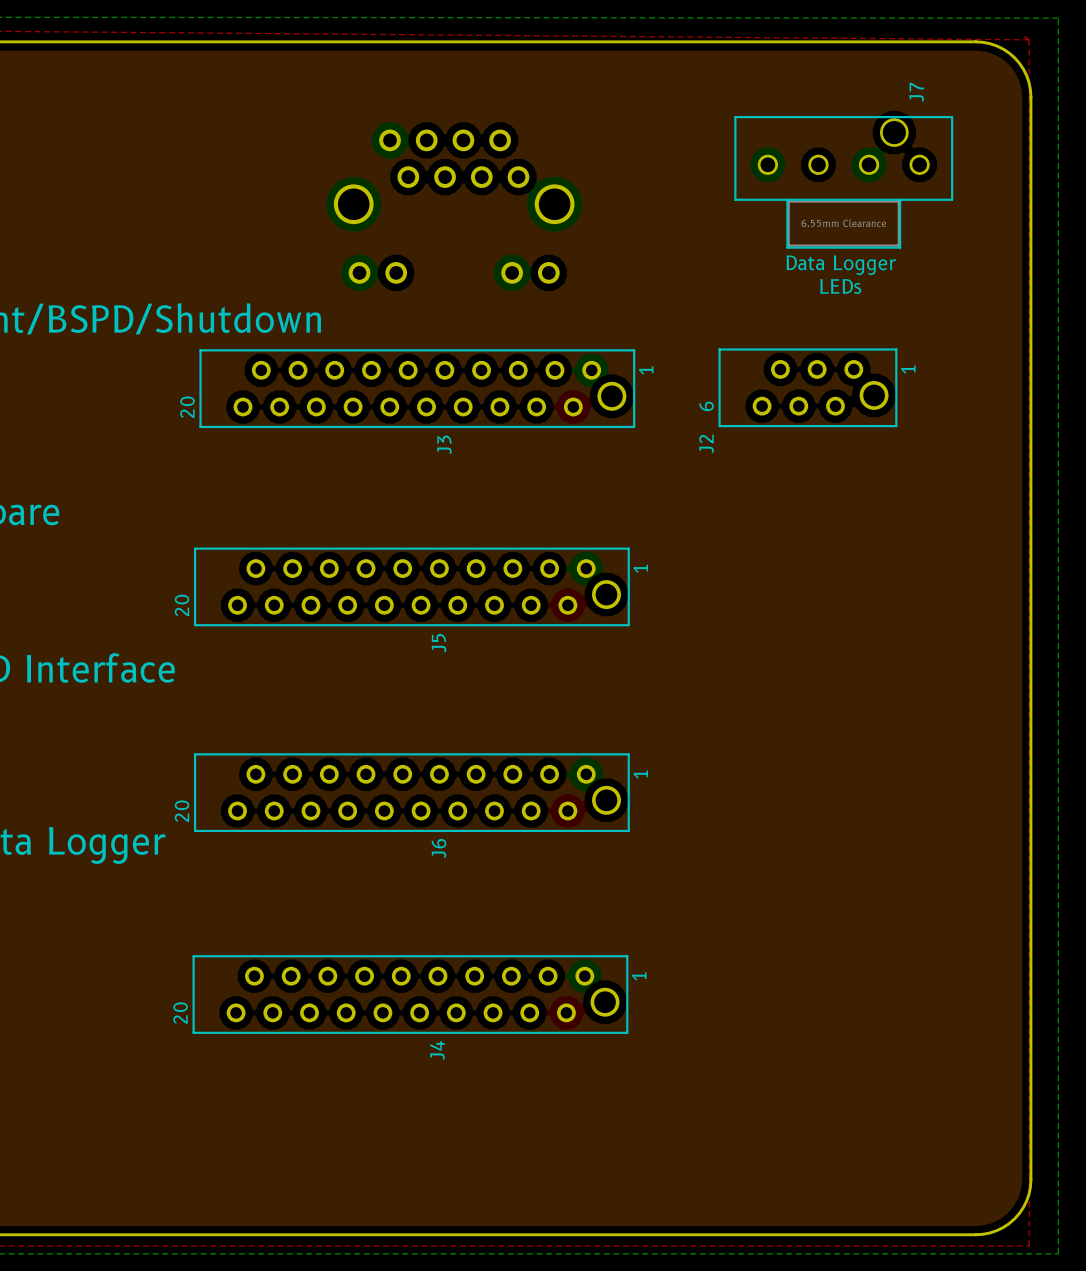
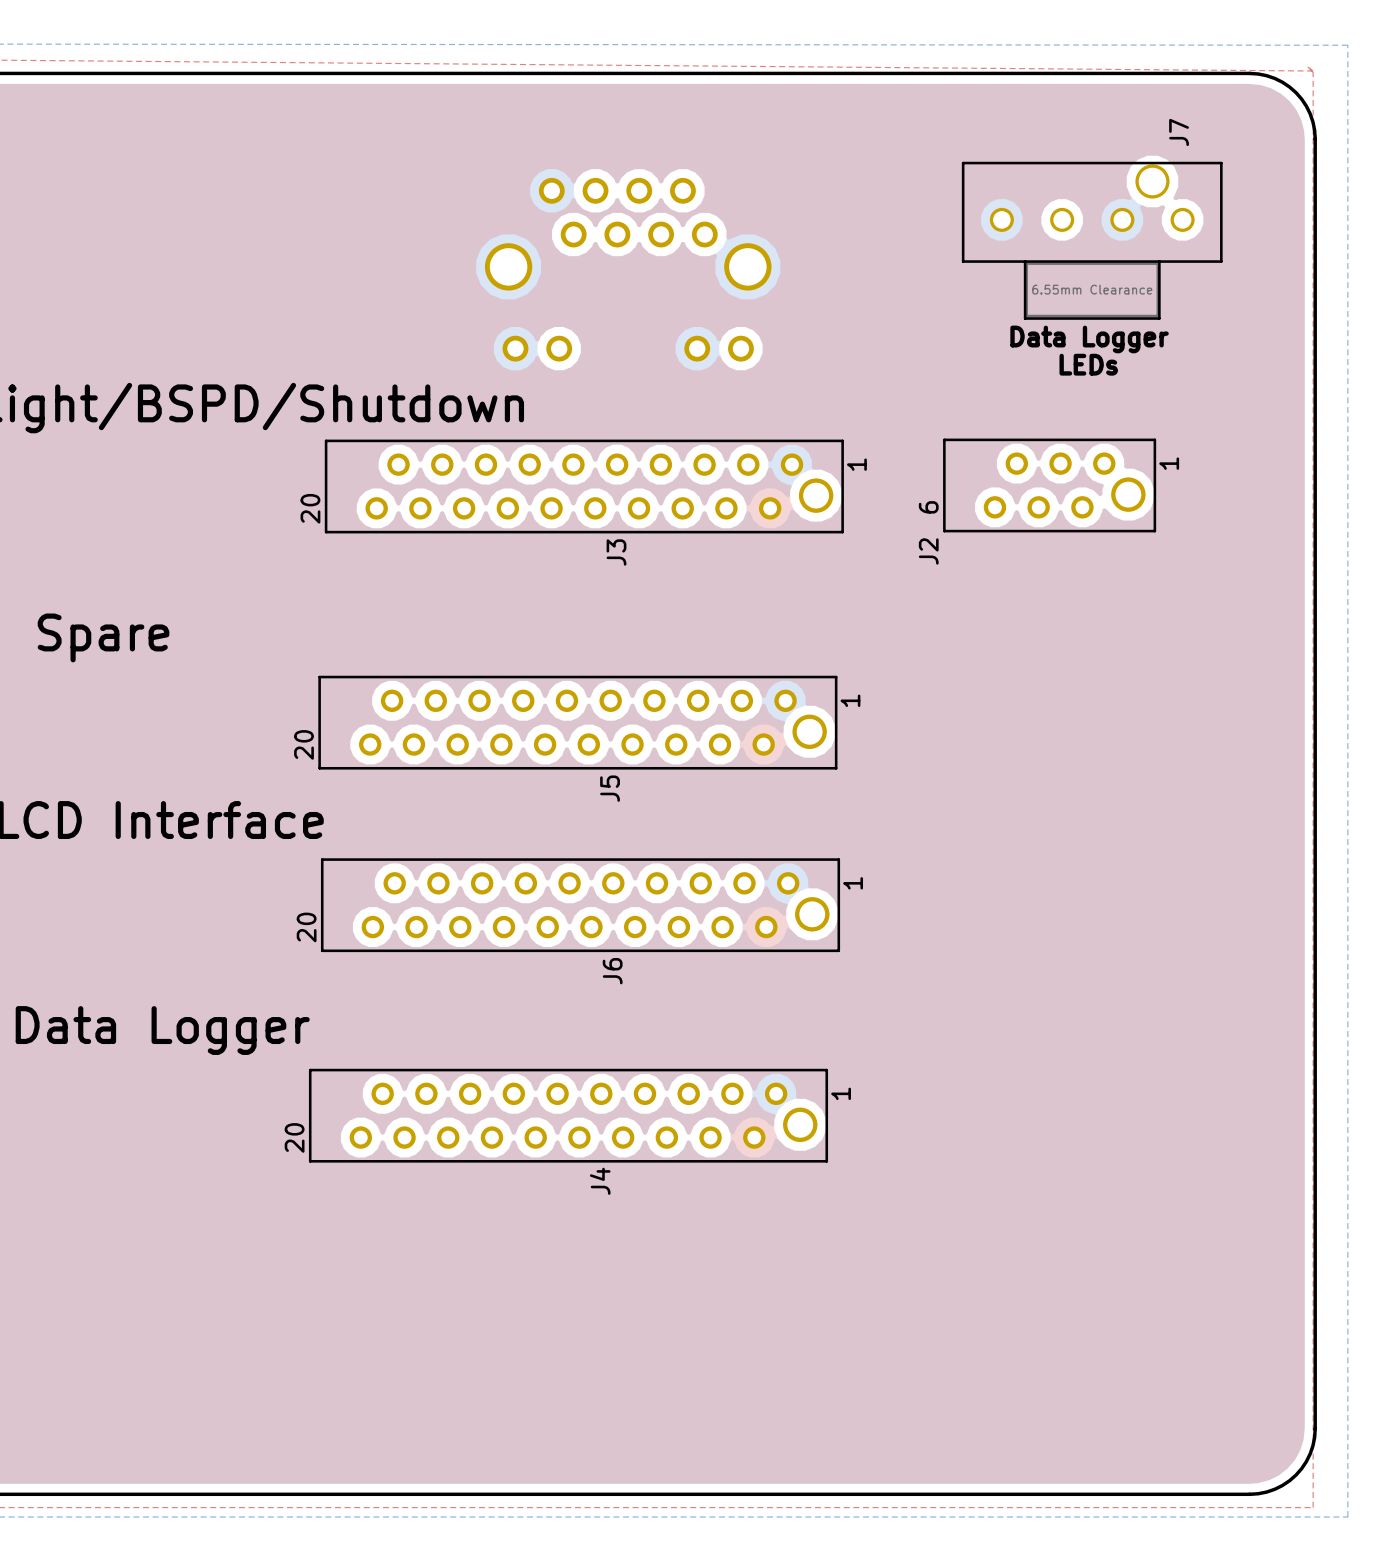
J6 position: (411, 792) -> (580, 905)
J4 position: (410, 994) -> (568, 1115)

